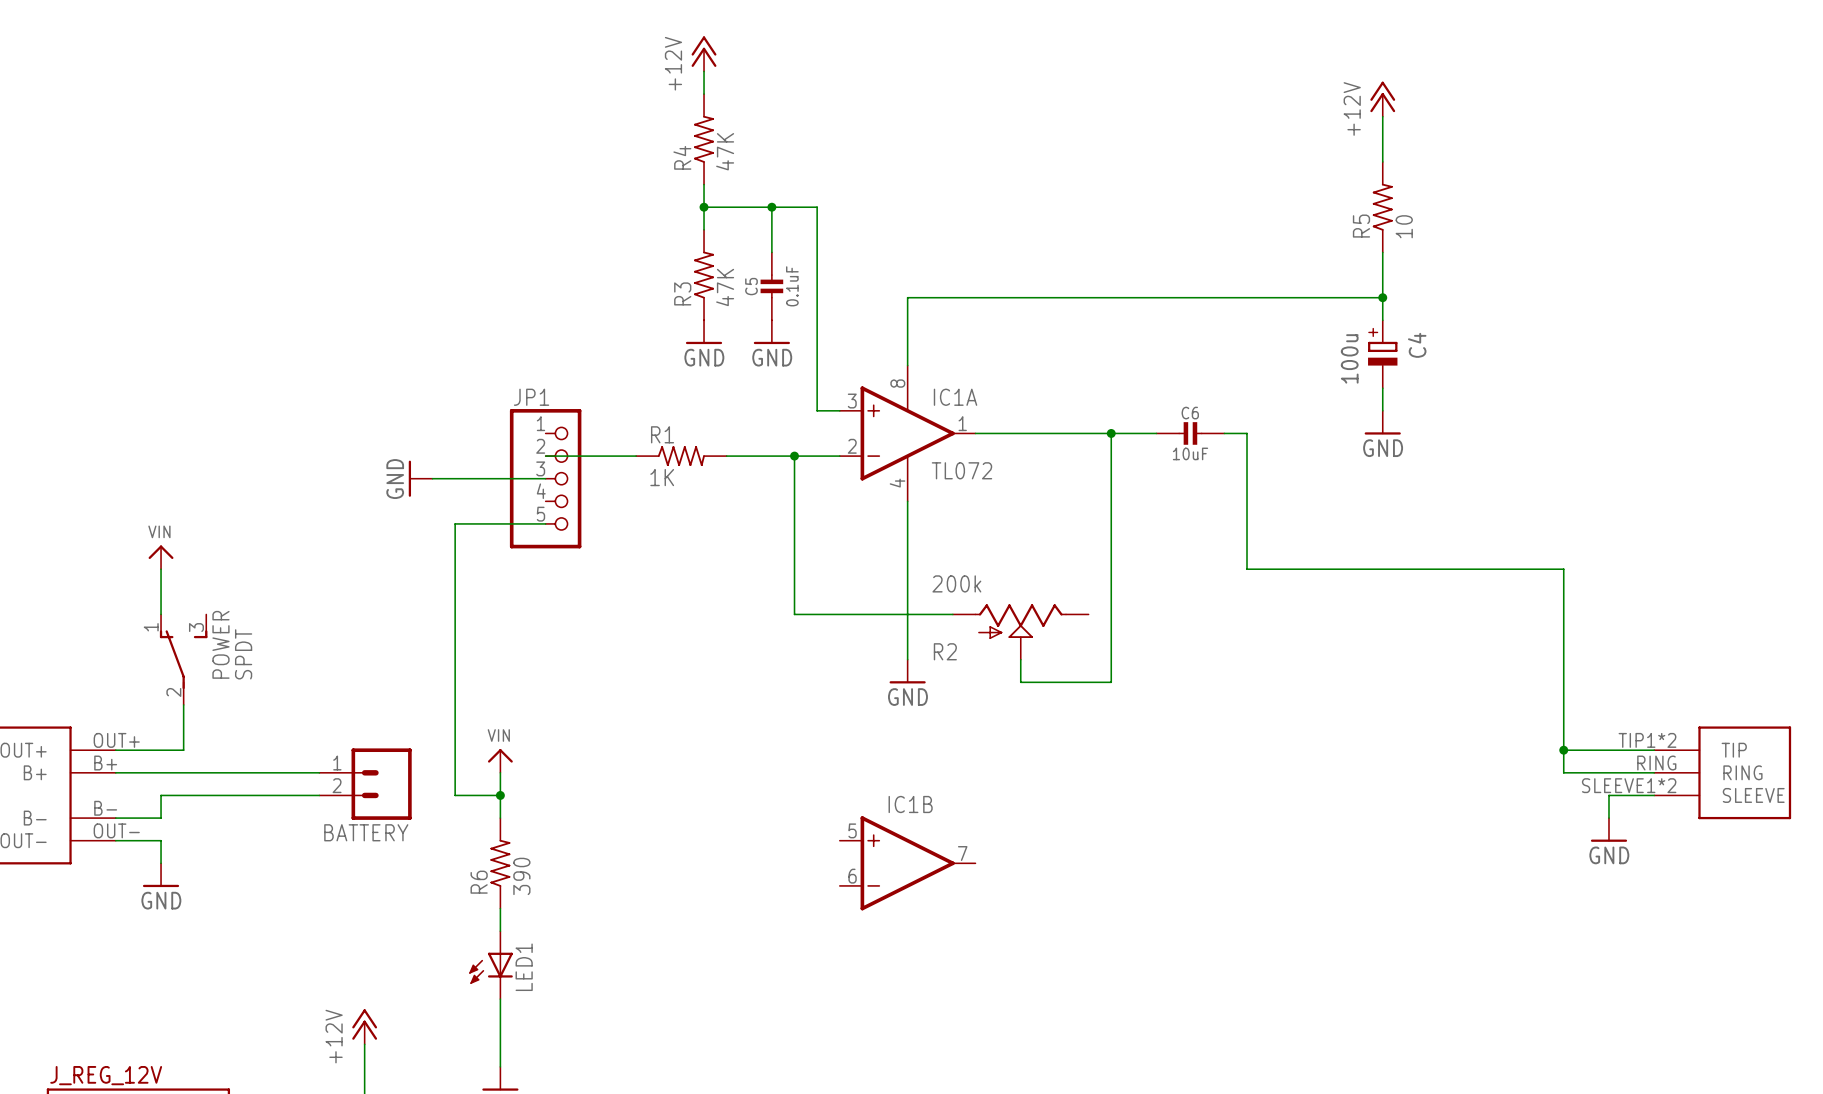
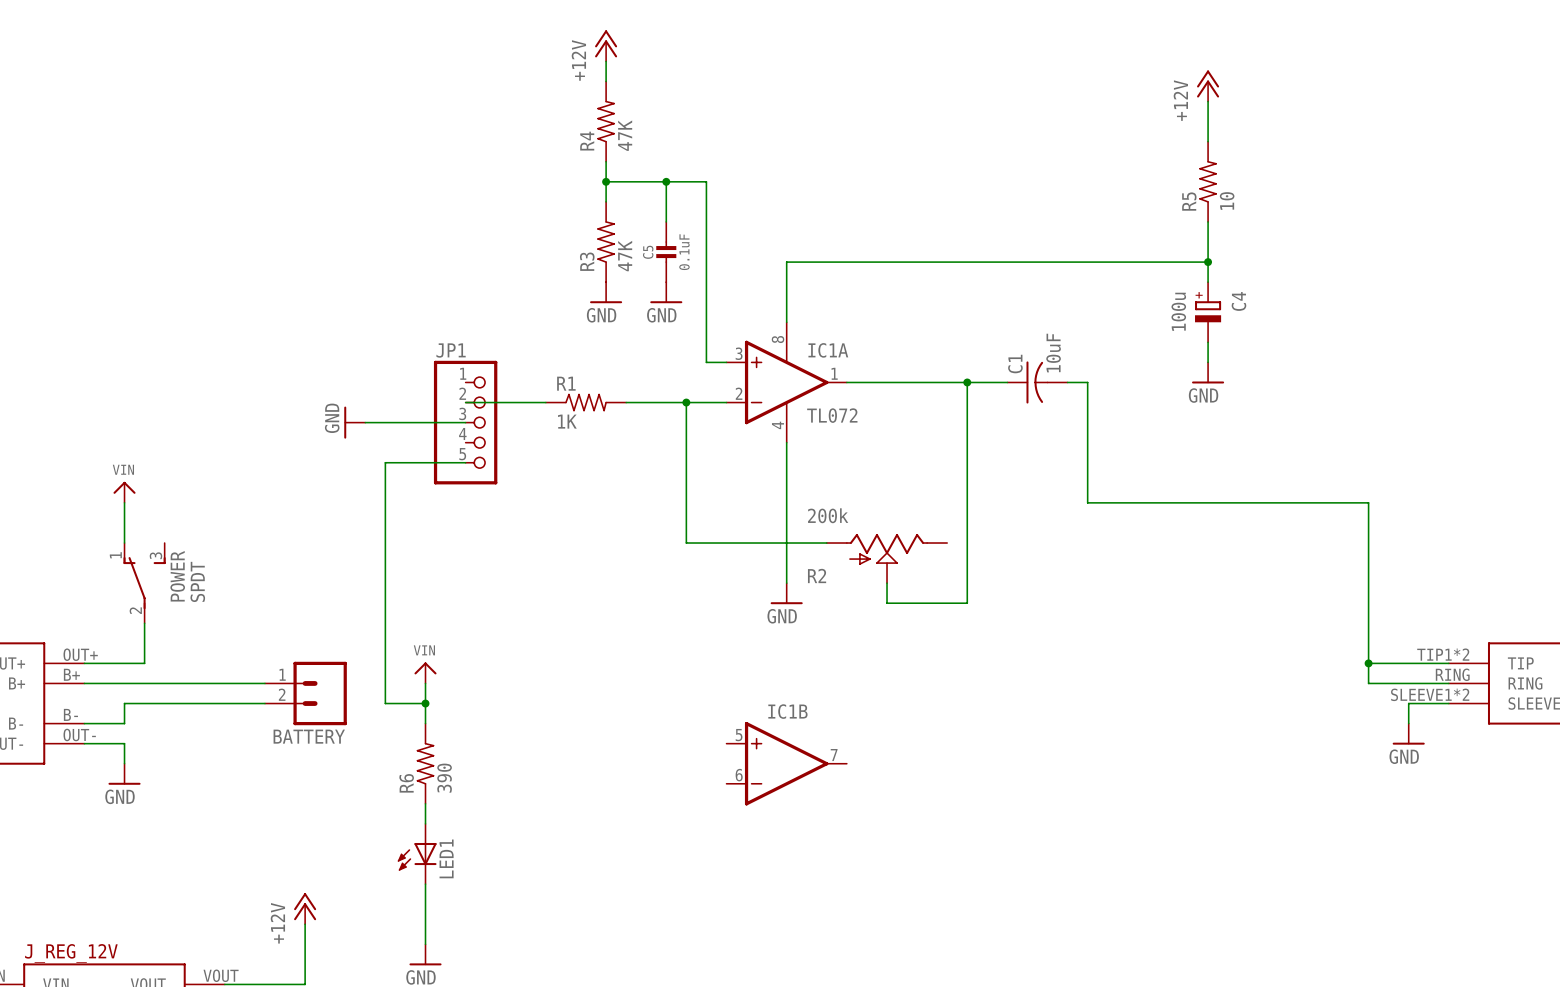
C6: 10uF (1190, 433) -> none
C1: none -> 10uF (1037, 382)

